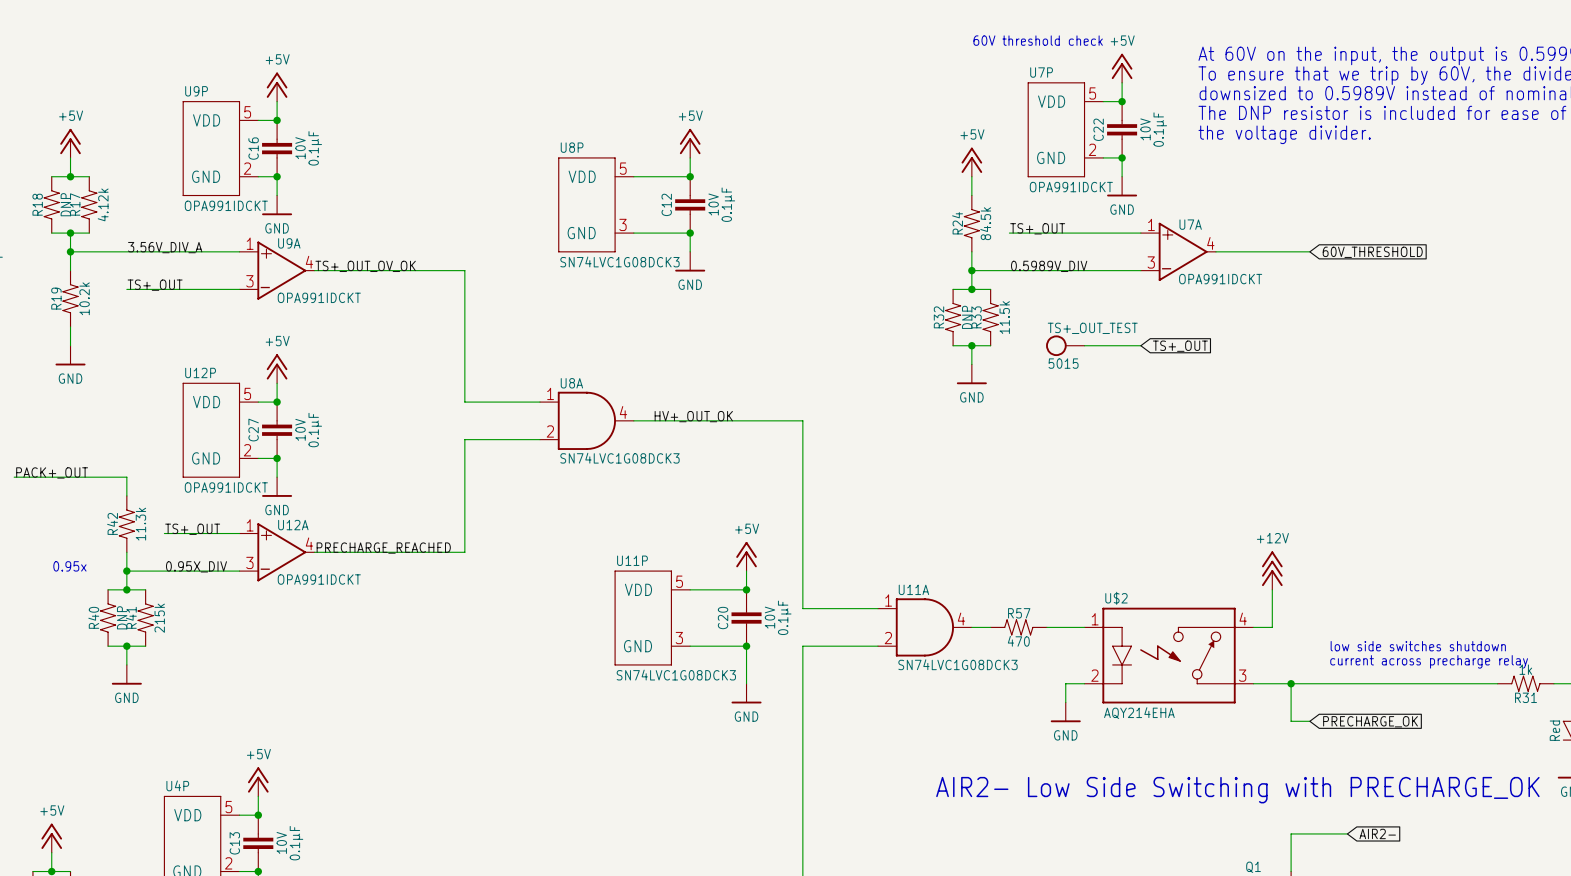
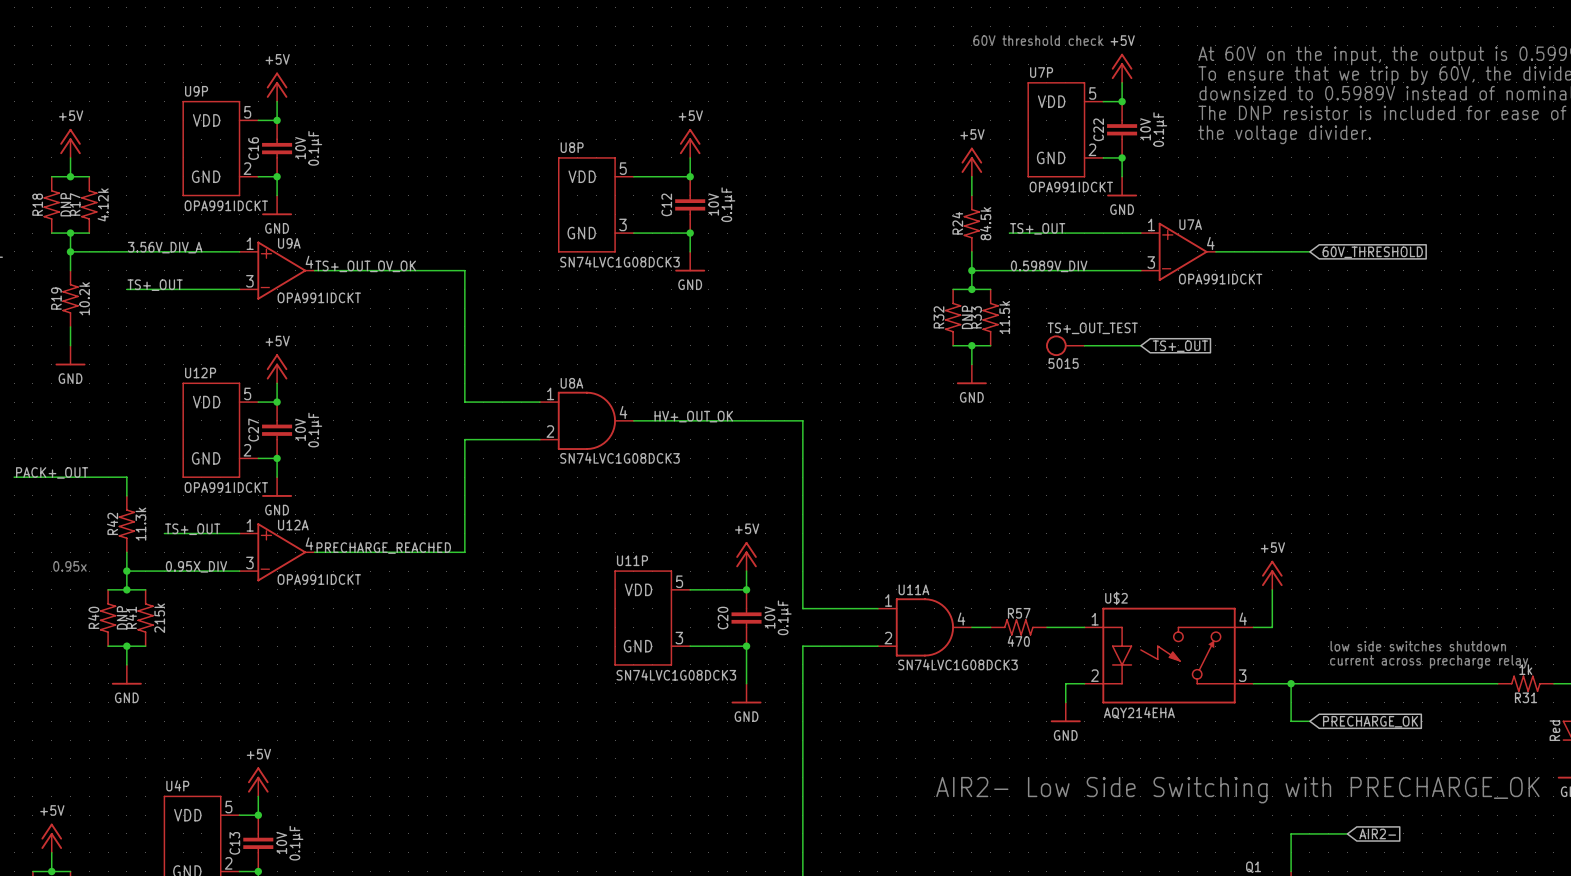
power symbol: +12V (1272, 570) -> +5V (1272, 575)

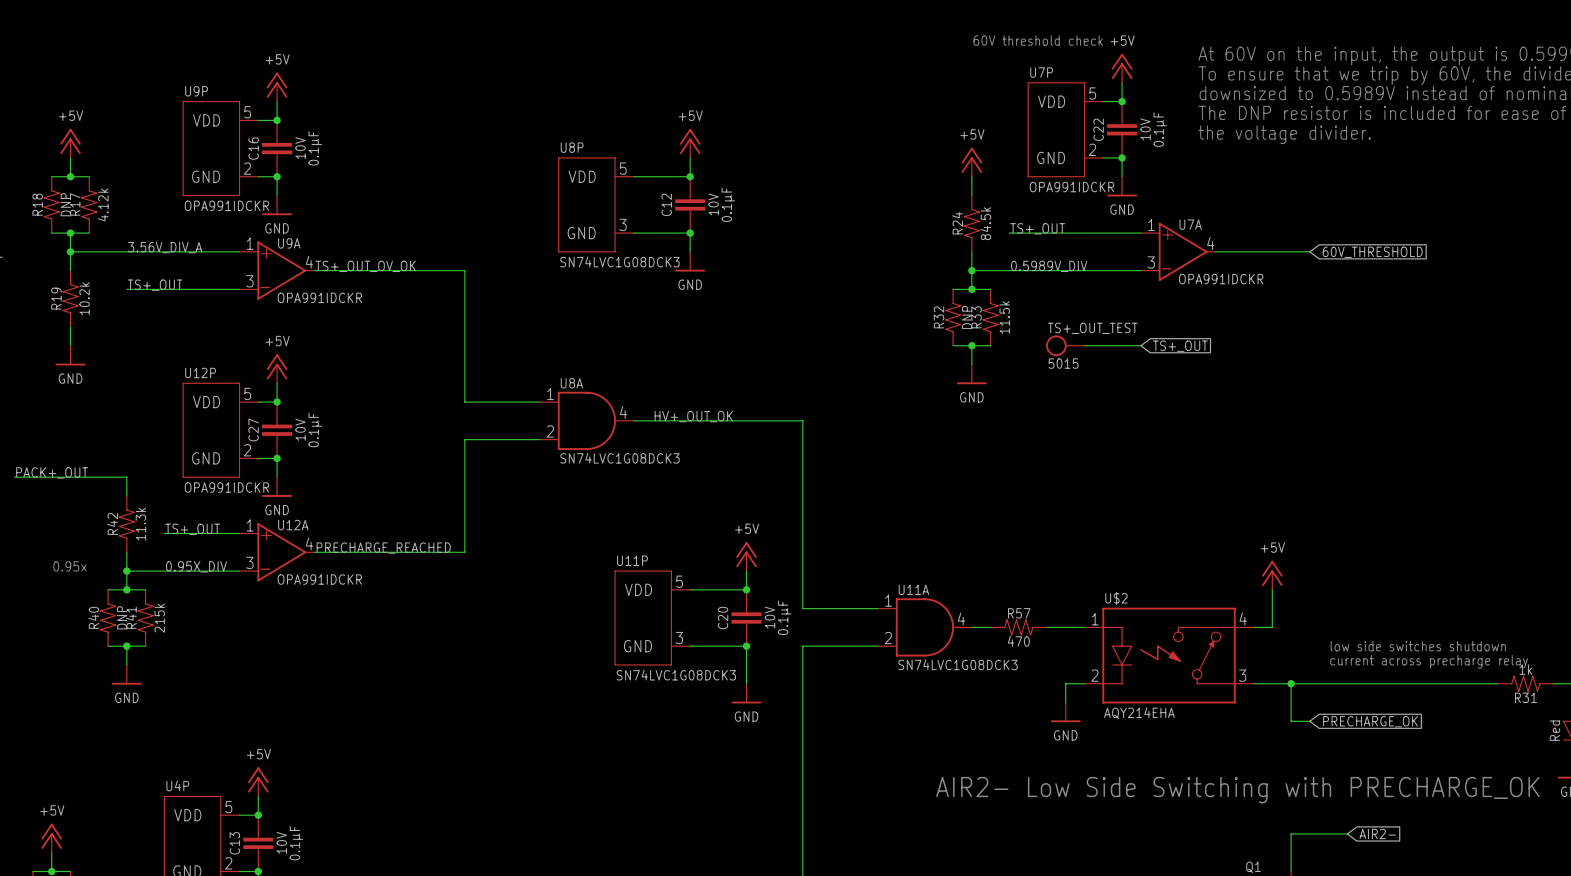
U7P text: OPA991IDCKT (1071, 187) -> OPA991IDCKR (1071, 187)
U9P text: OPA991IDCKT (226, 205) -> OPA991IDCKR (226, 205)
U7A text: OPA991IDCKT (1220, 279) -> OPA991IDCKR (1221, 279)
U9A text: OPA991IDCKT (319, 297) -> OPA991IDCKR (319, 297)
U12P text: OPA991IDCKT (226, 487) -> OPA991IDCKR (226, 487)
U12A text: OPA991IDCKT (319, 579) -> OPA991IDCKR (319, 579)

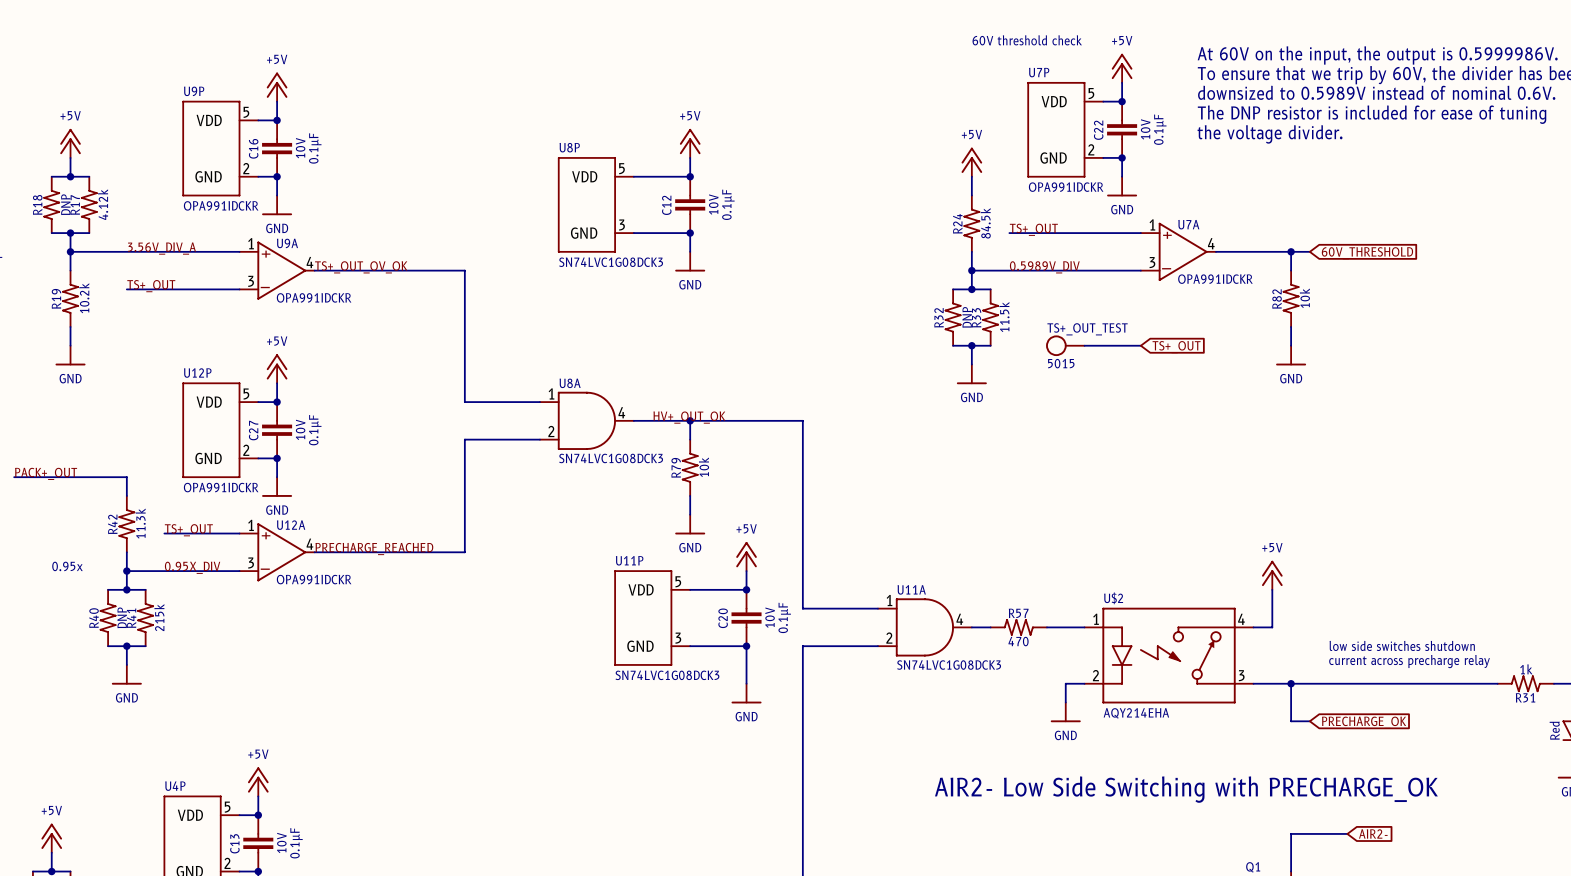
wire: none -> (1291, 251) (1291, 270)
junction: none -> (1291, 251)
R82: none -> (1291, 298)
wire: none -> (1291, 326) (1291, 345)
power symbol: none -> GND (1291, 355)
wire: none -> (690, 420) (690, 439)
junction: none -> (690, 420)
R79: none -> (690, 467)
wire: none -> (690, 495) (690, 514)
power symbol: none -> GND (690, 524)

